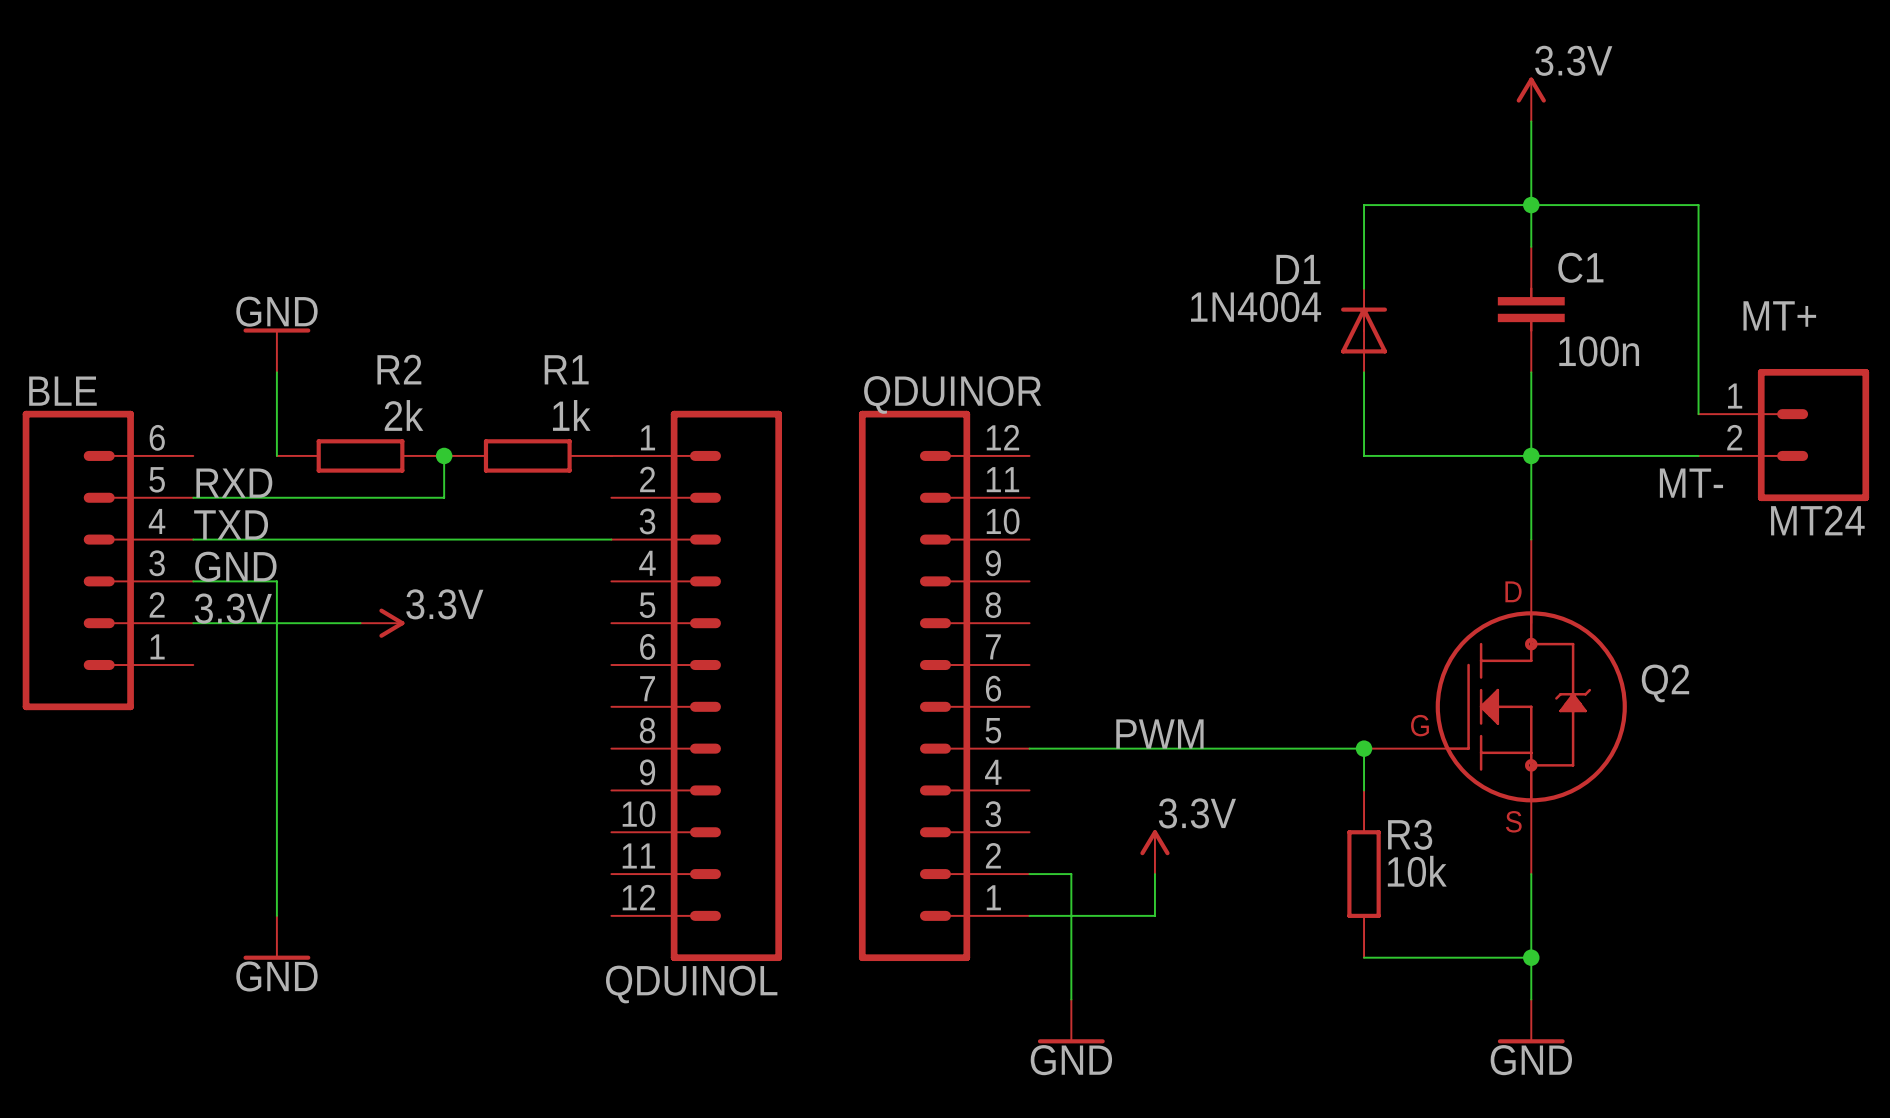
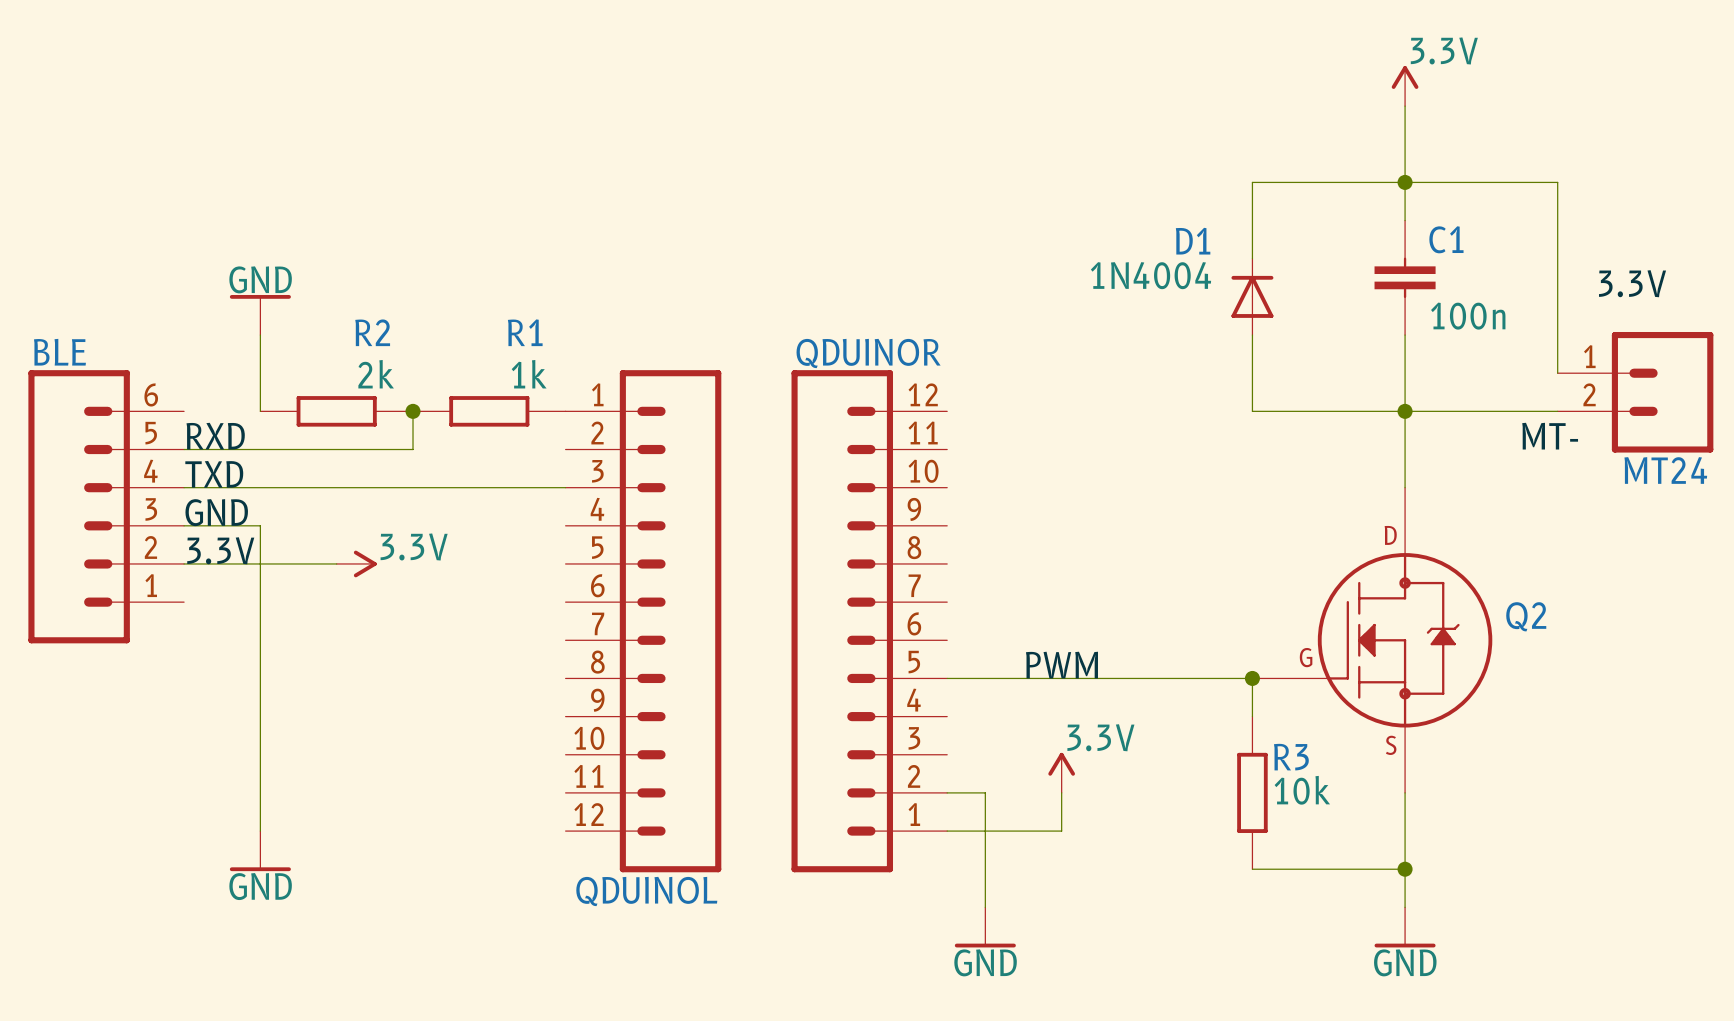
label: MT+ (1779, 315) -> 3.3V (1632, 283)

